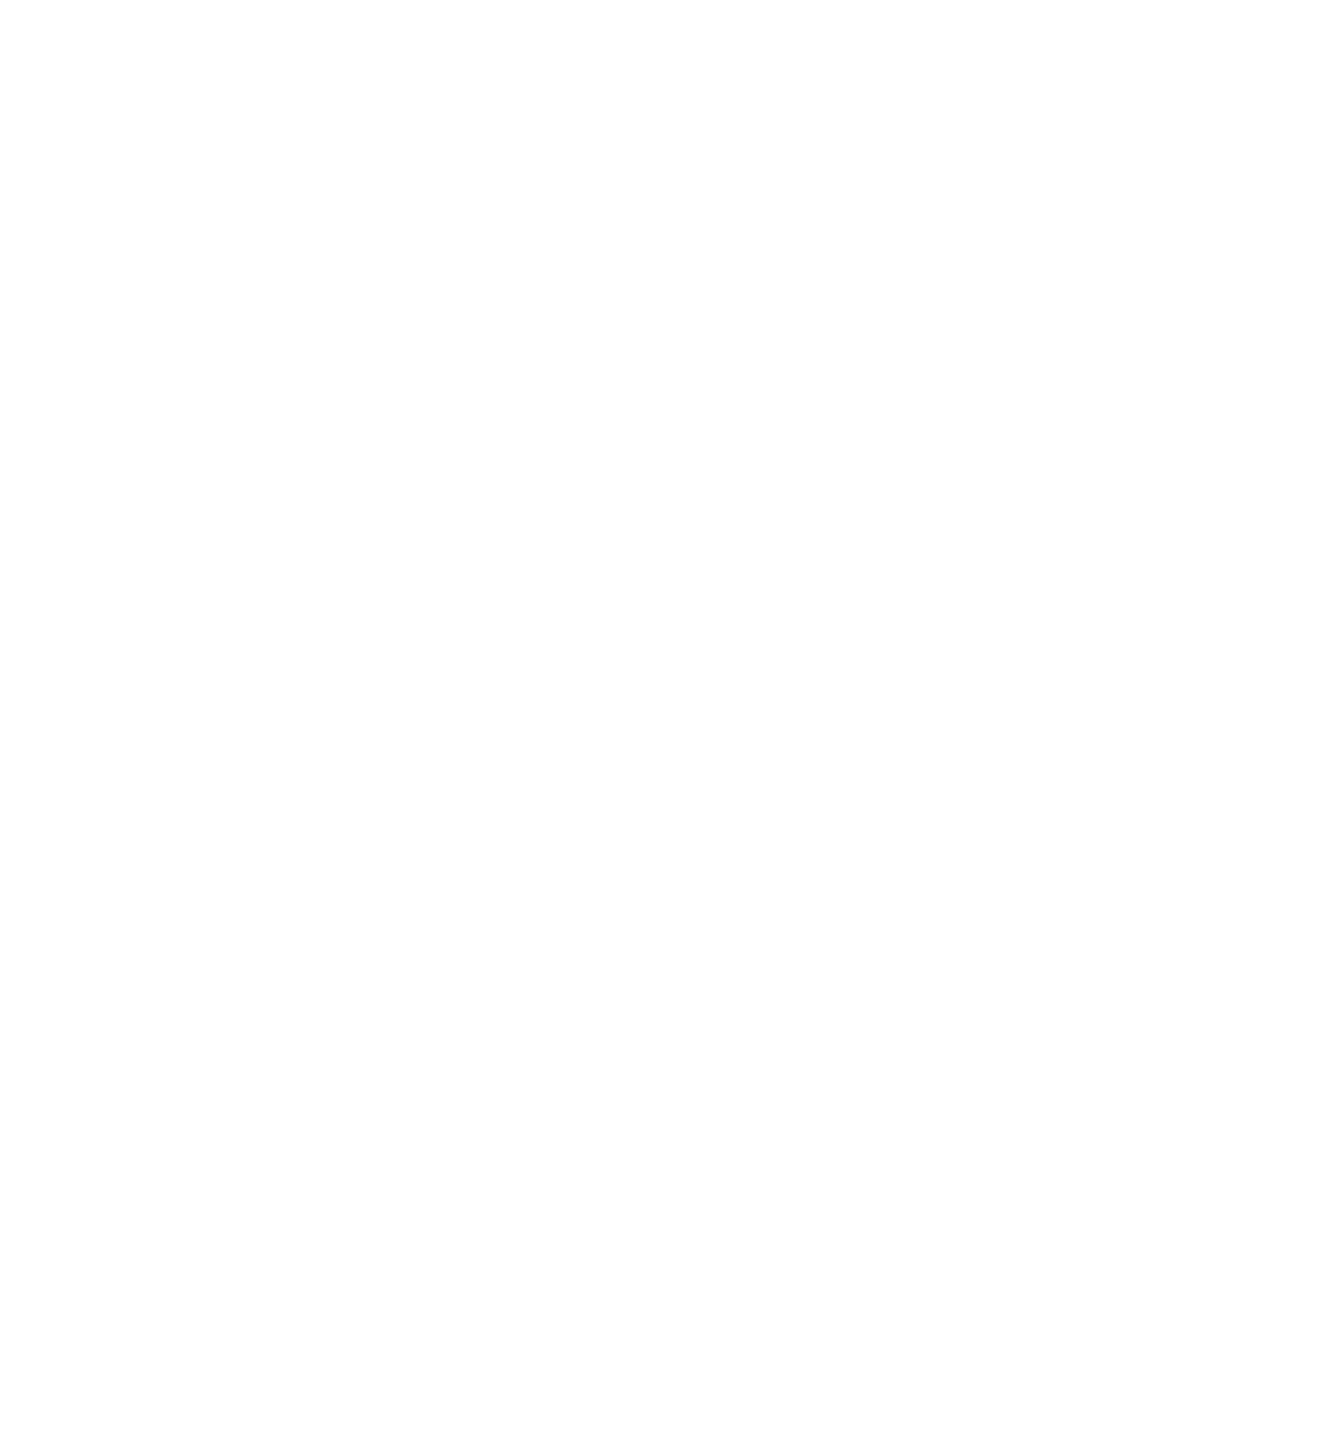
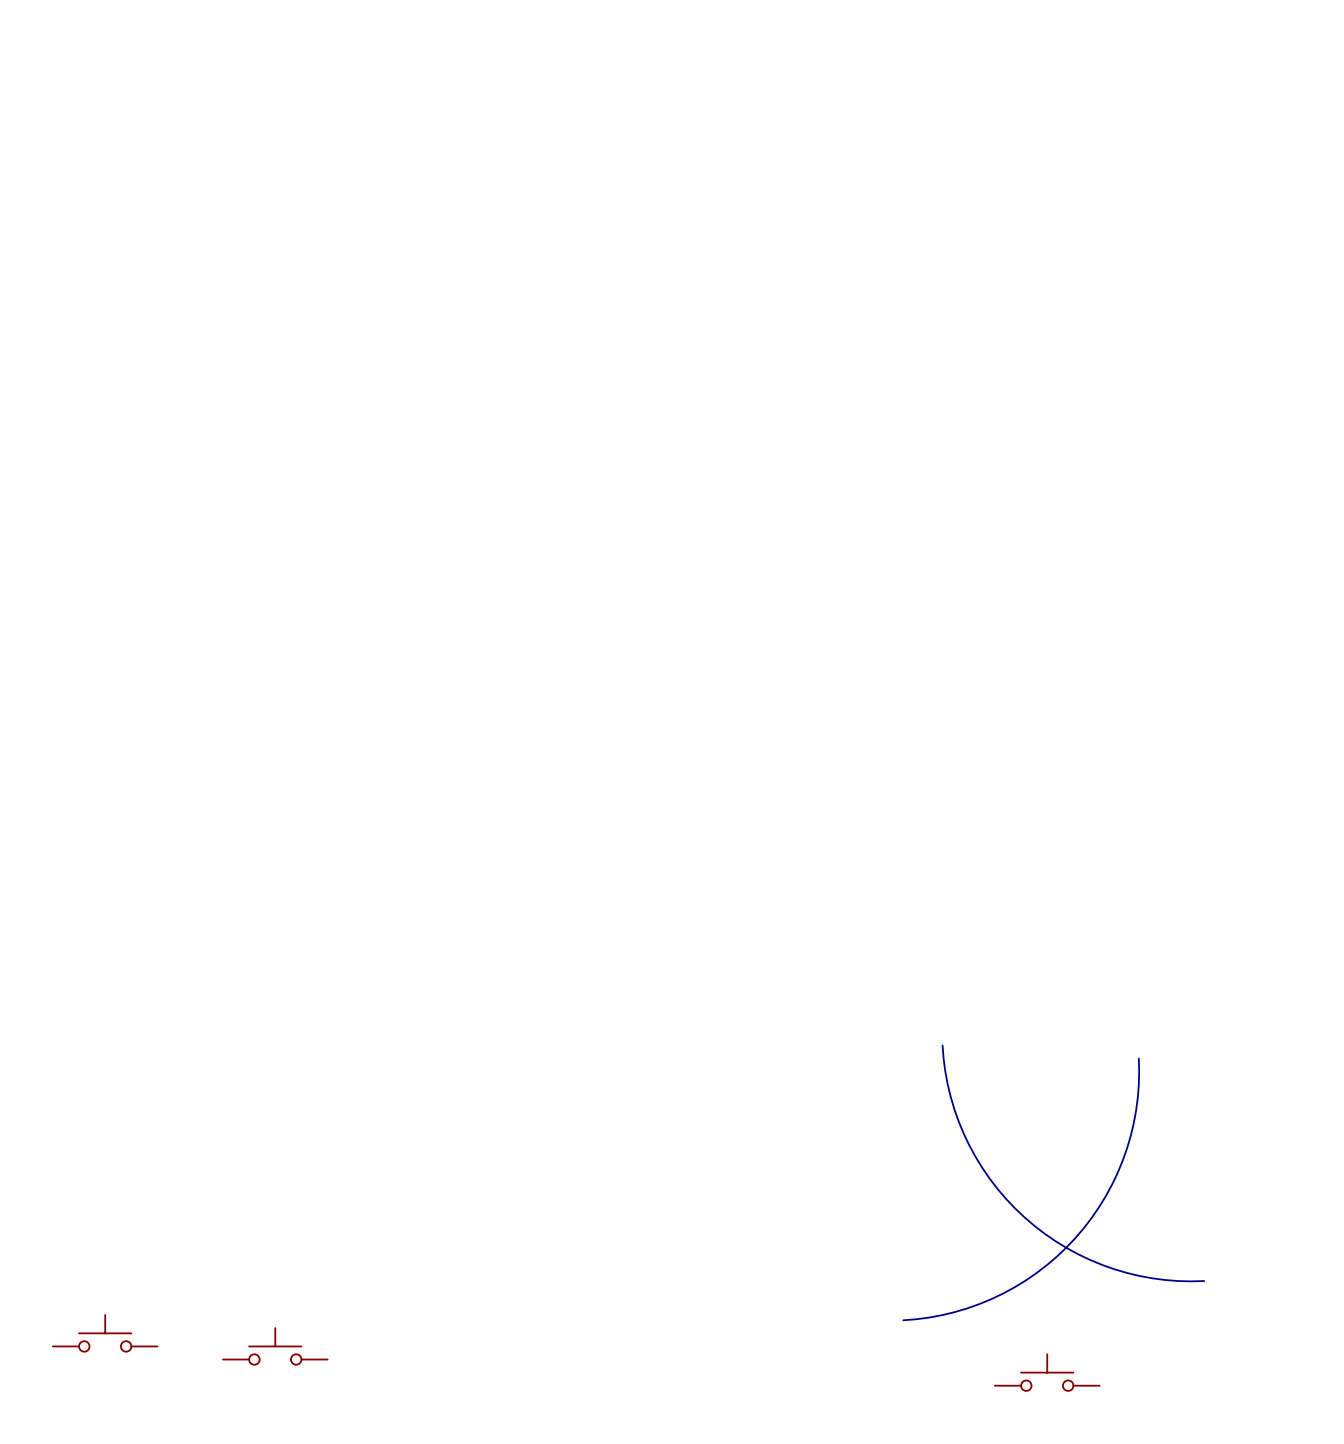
line: none -> (942, 1045) (950, 1096) (963, 1133) (989, 1178) (1024, 1217) (1055, 1241) (1102, 1264) (1152, 1278) (1204, 1281)
line: none -> (1138, 1058) (1136, 1110) (1122, 1160) (1105, 1196) (1075, 1238) (1046, 1265) (1003, 1293) (954, 1312) (903, 1320)
part: none -> (105, 1333)
part: none -> (275, 1346)
part: none -> (1047, 1372)

